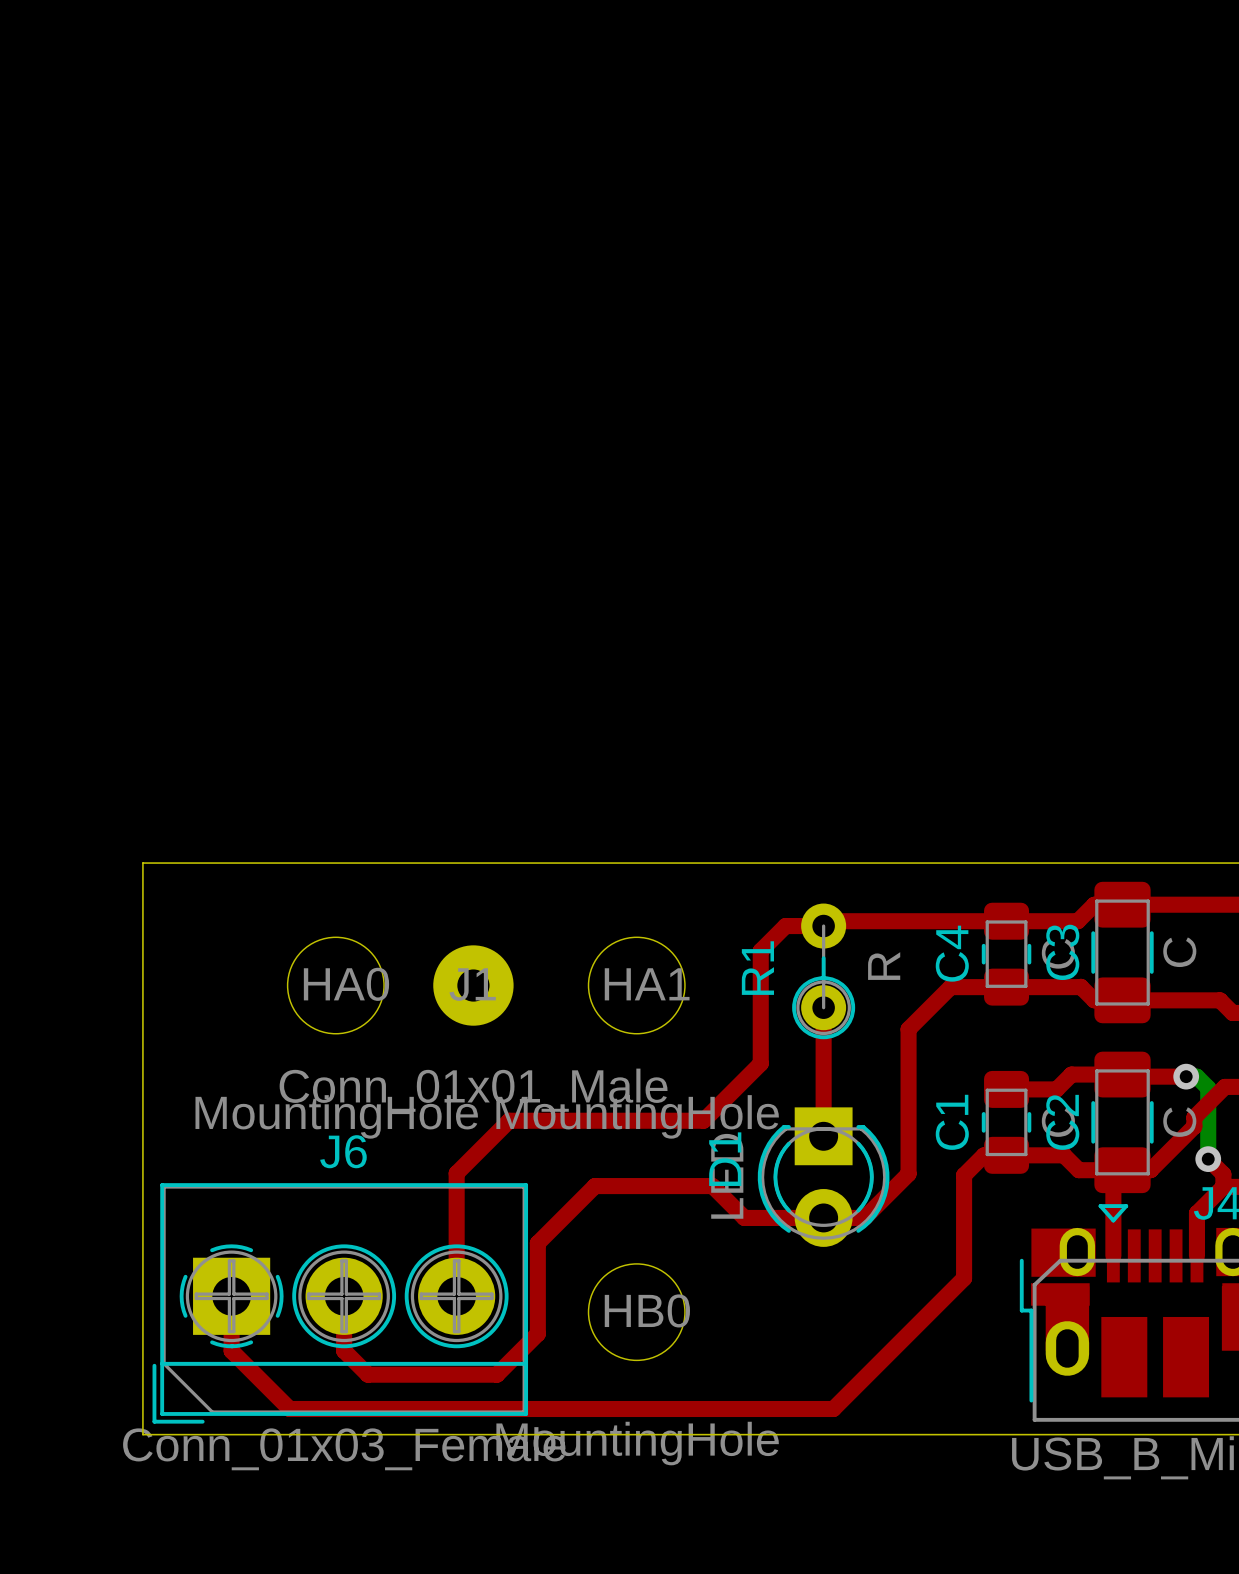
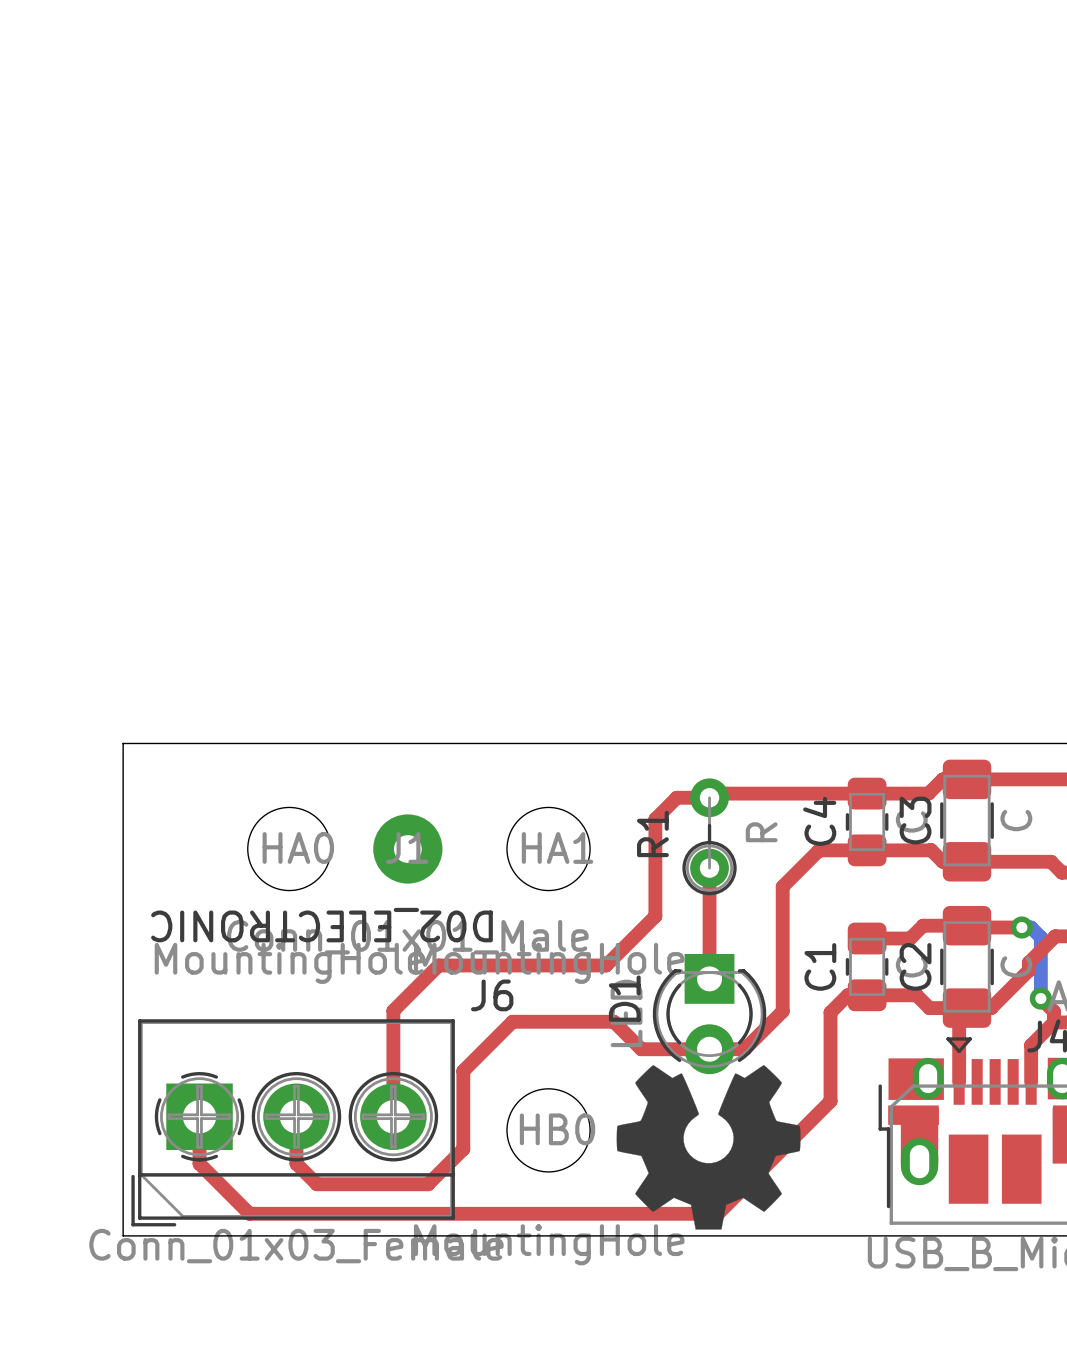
text: none -> D02_ELECTRONIC (321, 925)
J6 name position: J6 (343, 1151) -> J6 (492, 995)
drawing: none -> [616, 1065, 801, 1230]

